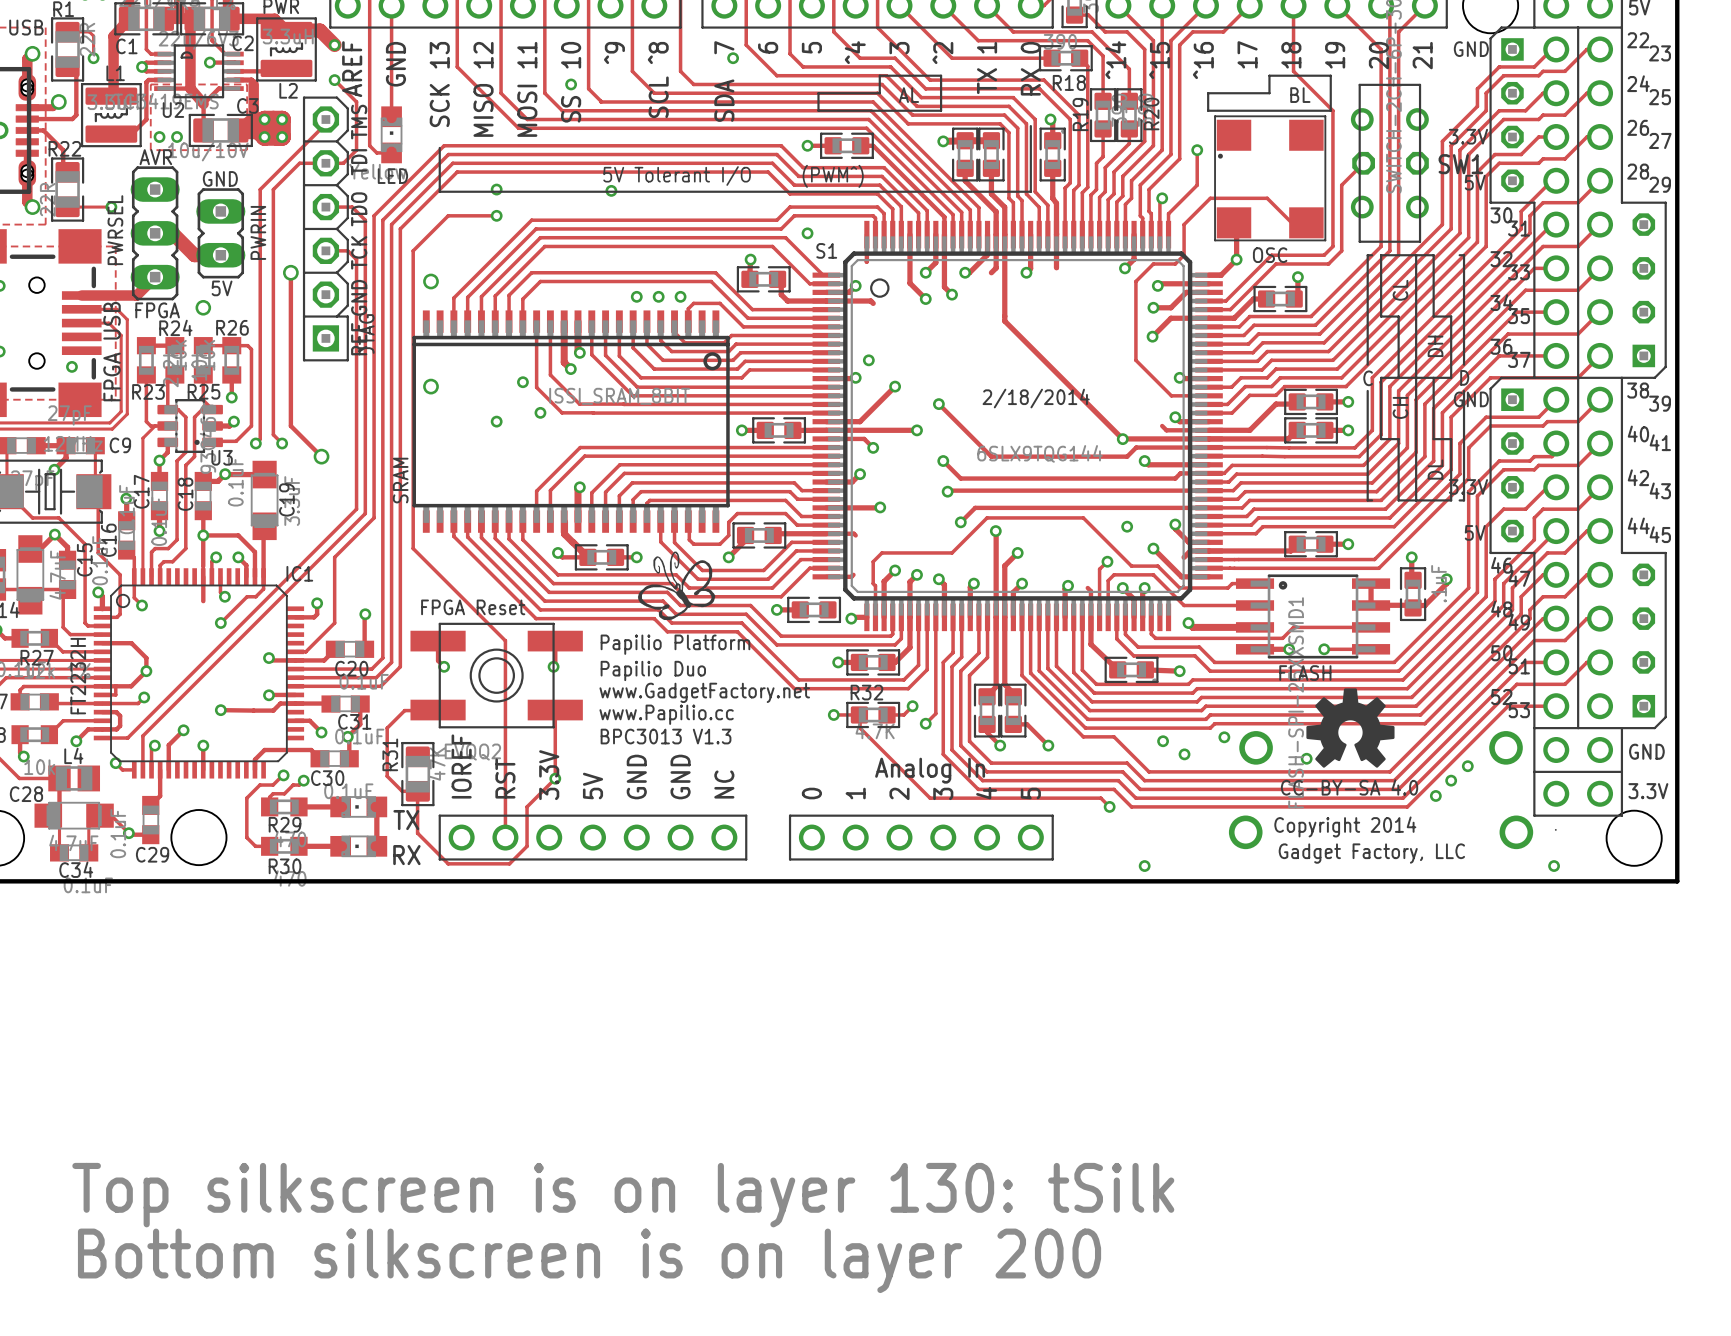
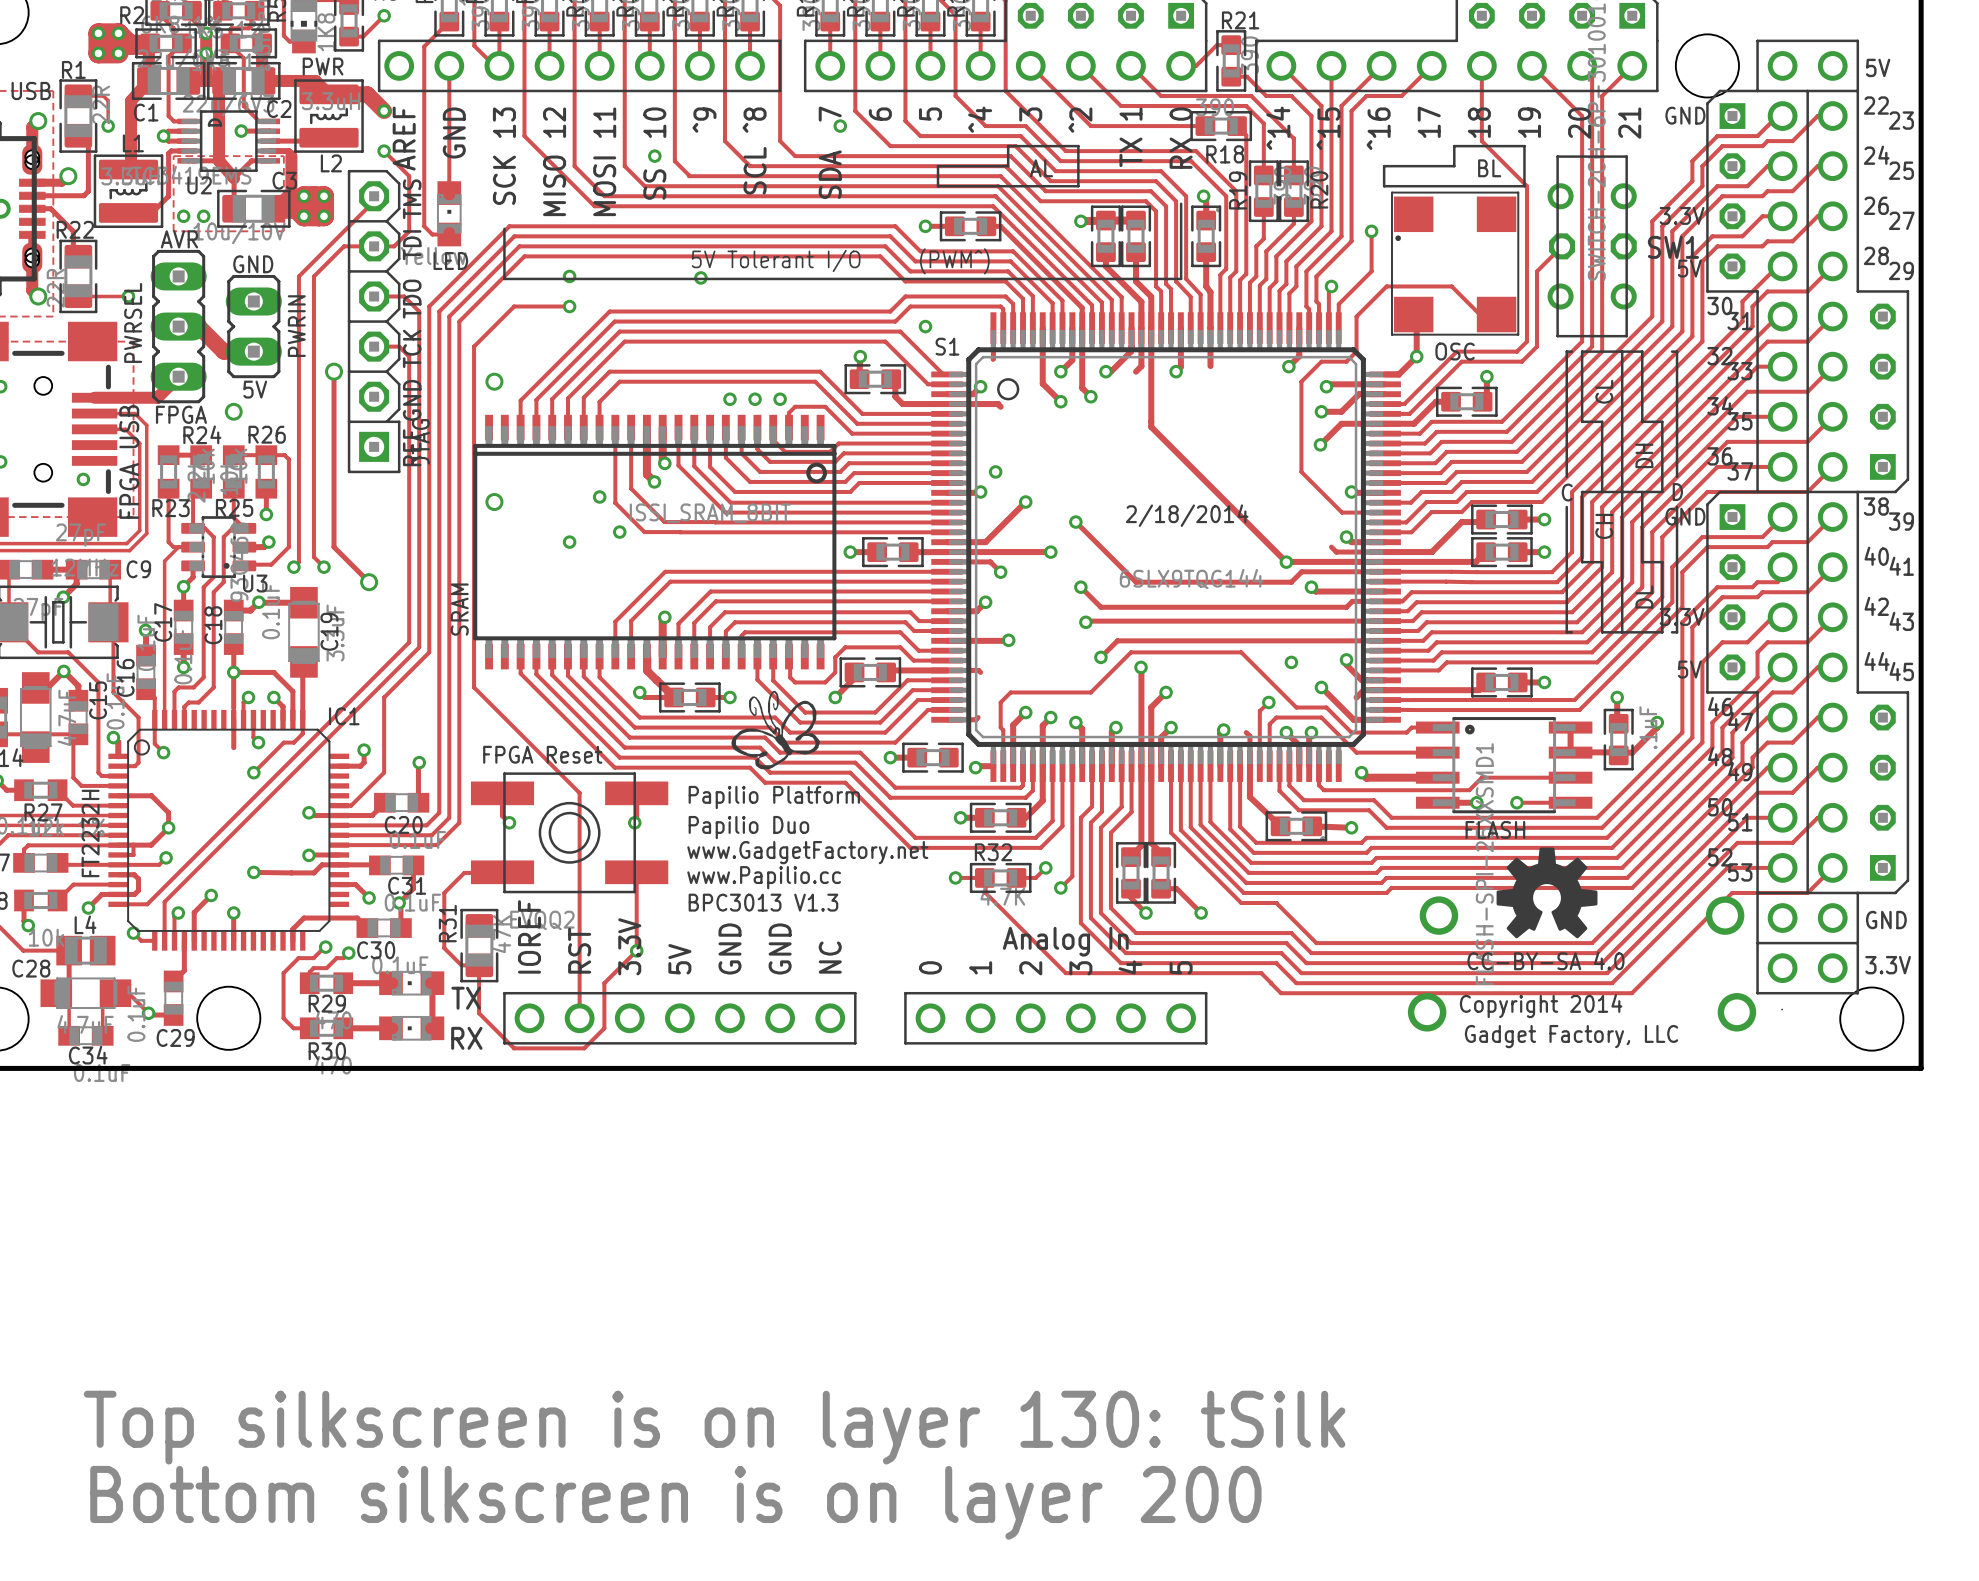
track: none -> (1832, 867) (1807, 892) (1732, 892) (1631, 993) (1281, 993) (1271, 983)
via: (1224, 737) -> none
via: (1163, 741) -> none
via: (1184, 754) -> none
via: (1306, 758) -> none
via: (1467, 766) -> none
via: (1451, 780) -> none
via: (1435, 795) -> none
via: (1109, 806) -> none
via: (1144, 866) -> none
via: (1554, 866) -> none

